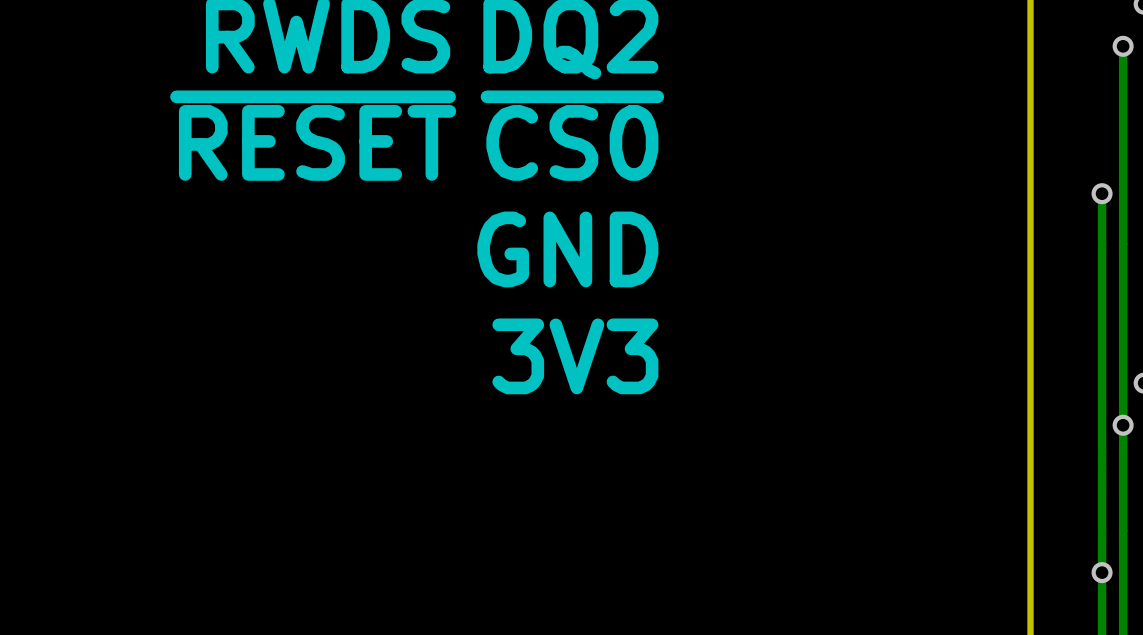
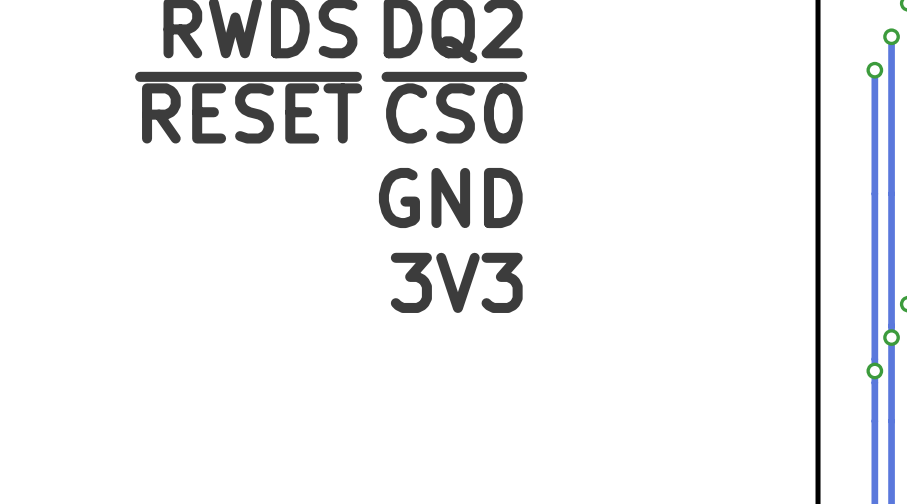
track: none -> (874, 70) (874, 153)
via: none -> (874, 70)
via: (1102, 193) -> none
via: none -> (874, 370)
via: (1102, 572) -> none

